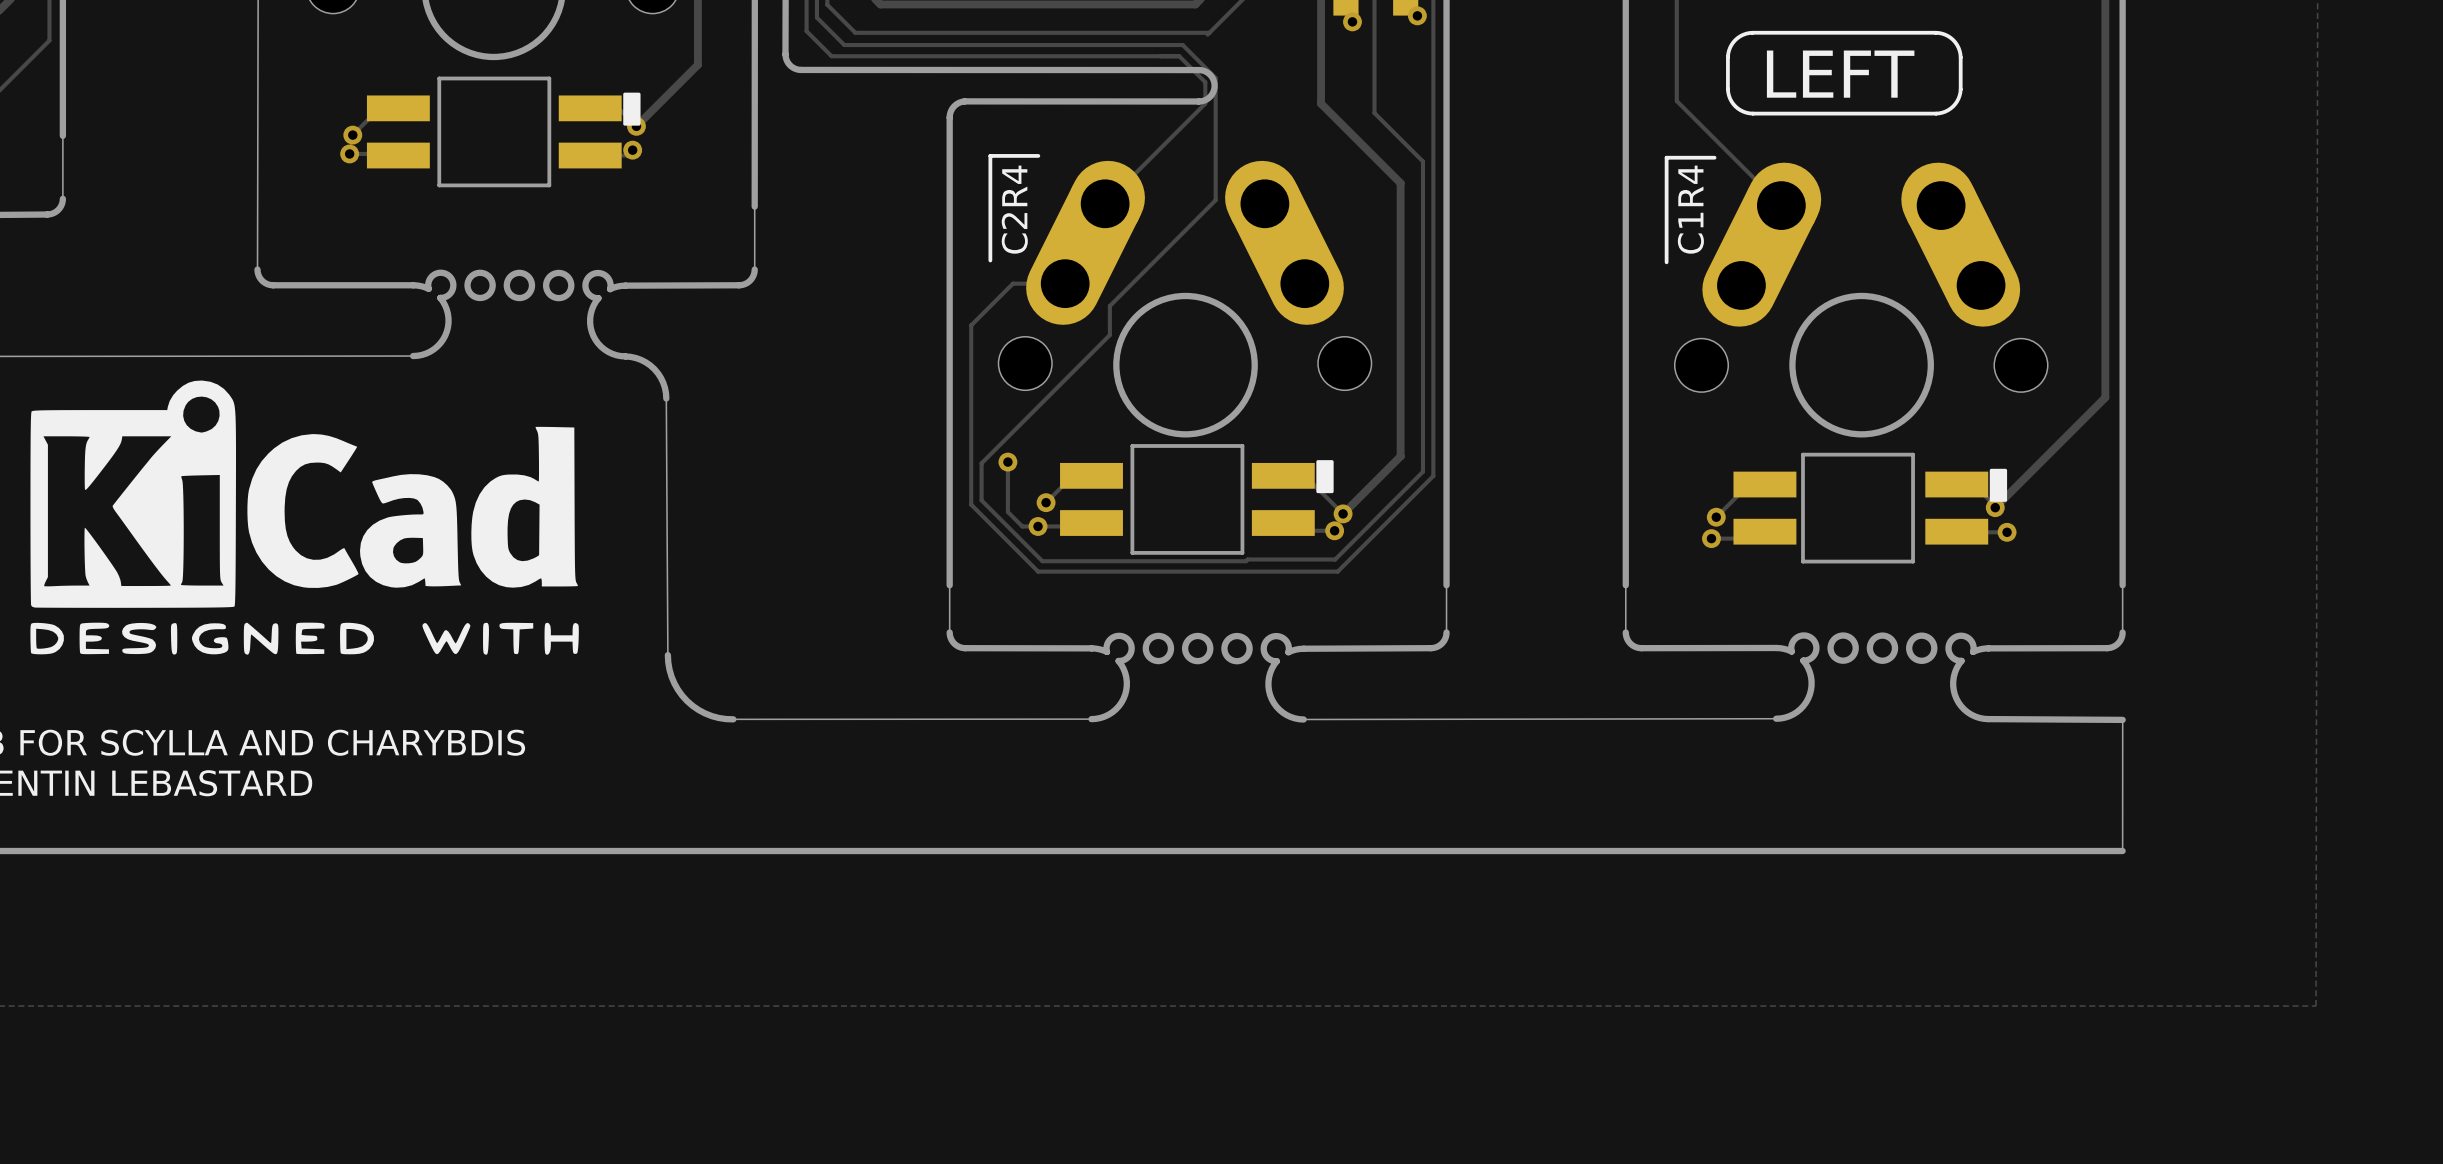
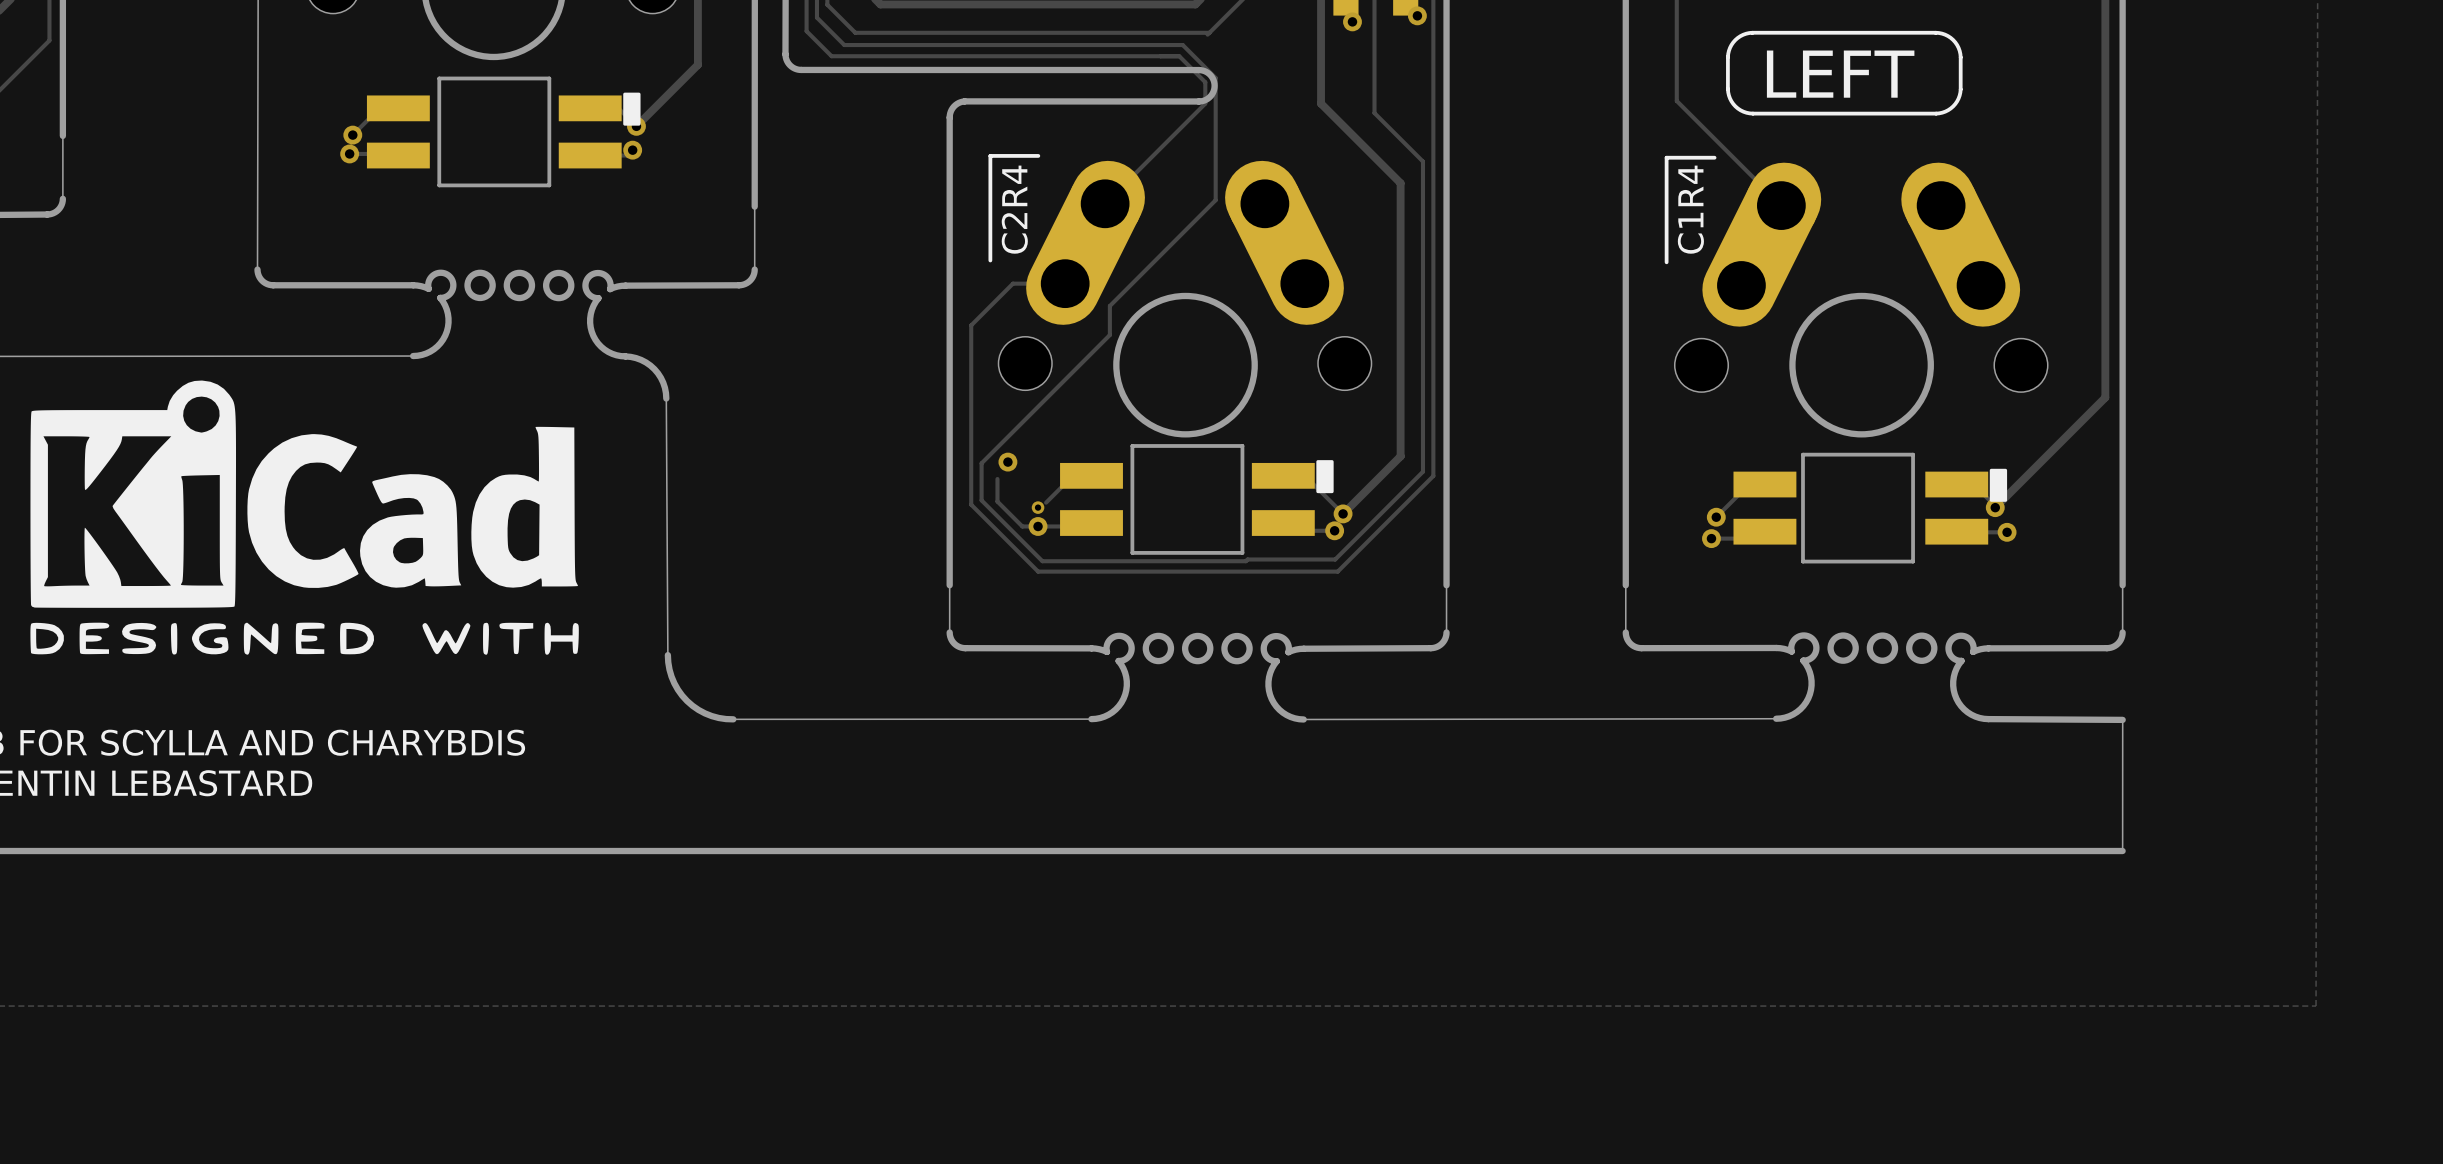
track: (1007, 462) (1007, 512) -> (997, 479) (997, 501) (1007, 512)
via size: [1036, 493, 1056, 513] -> [1031, 501, 1045, 514]

